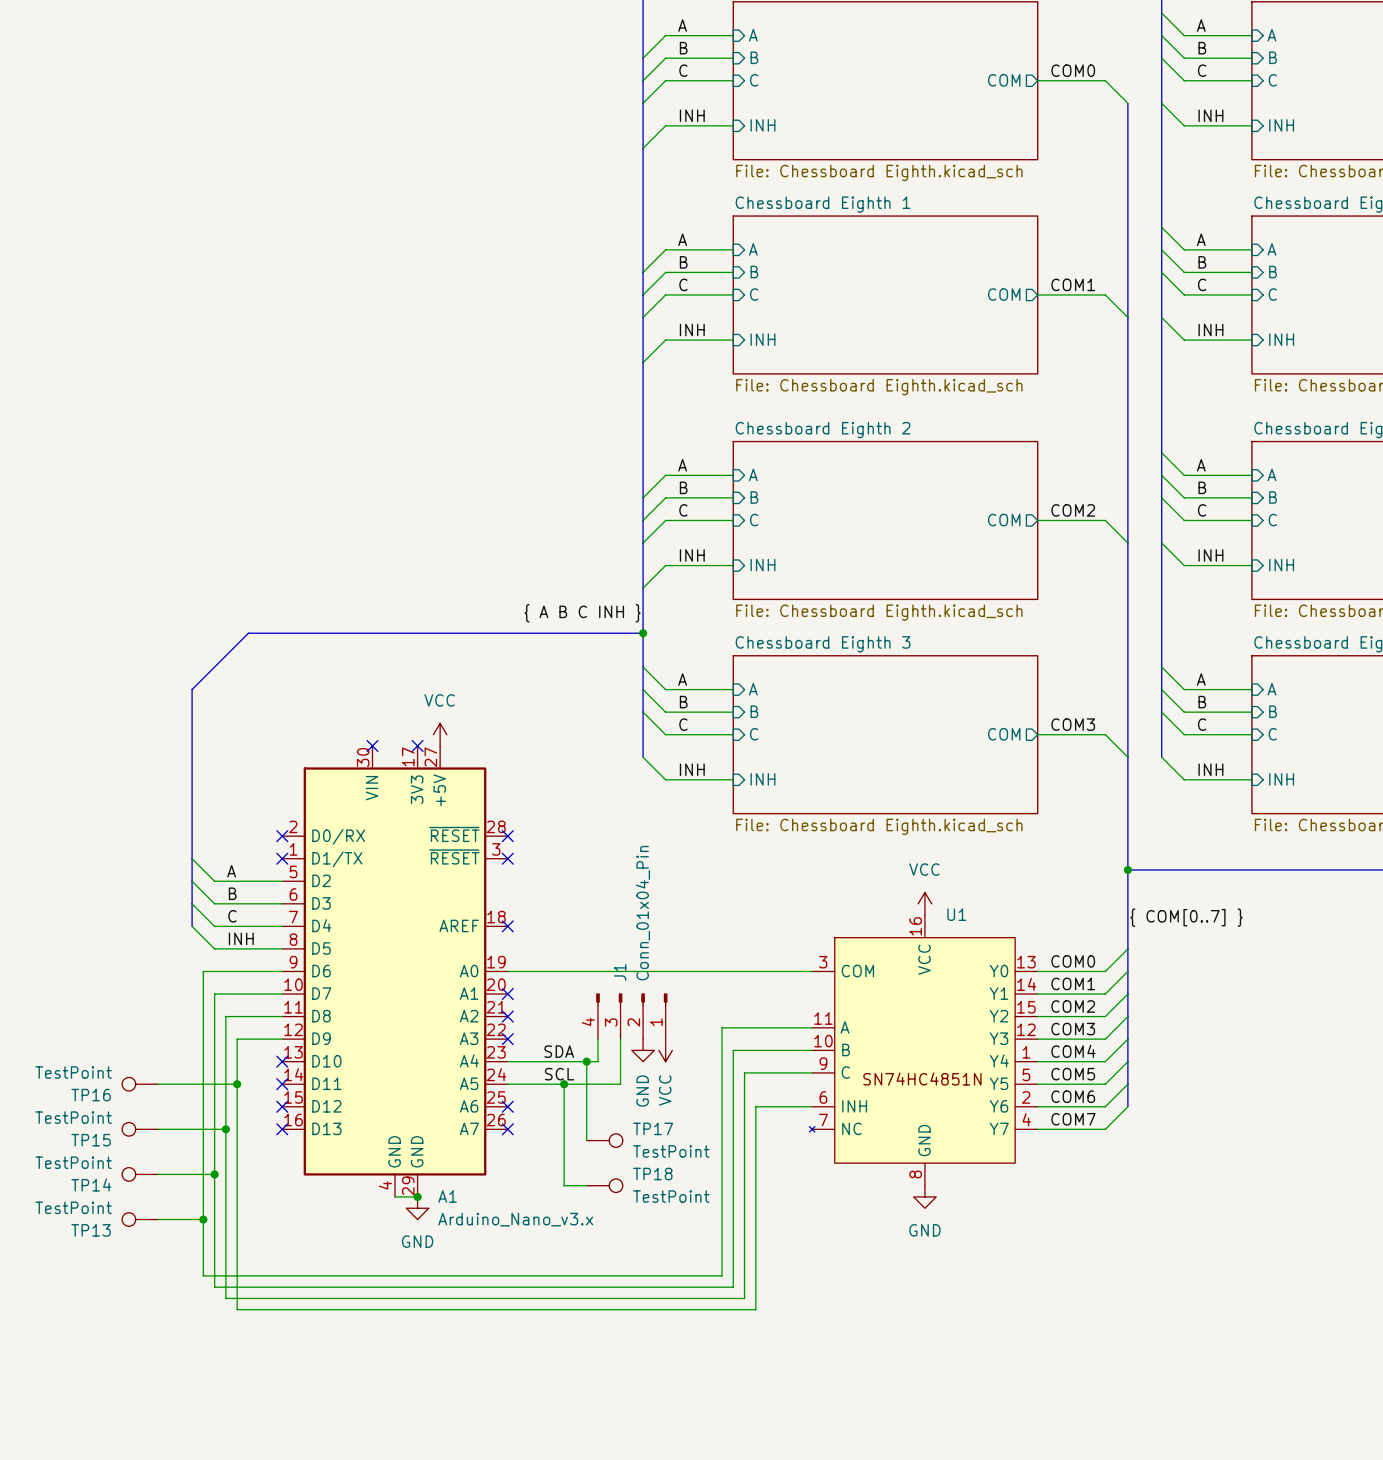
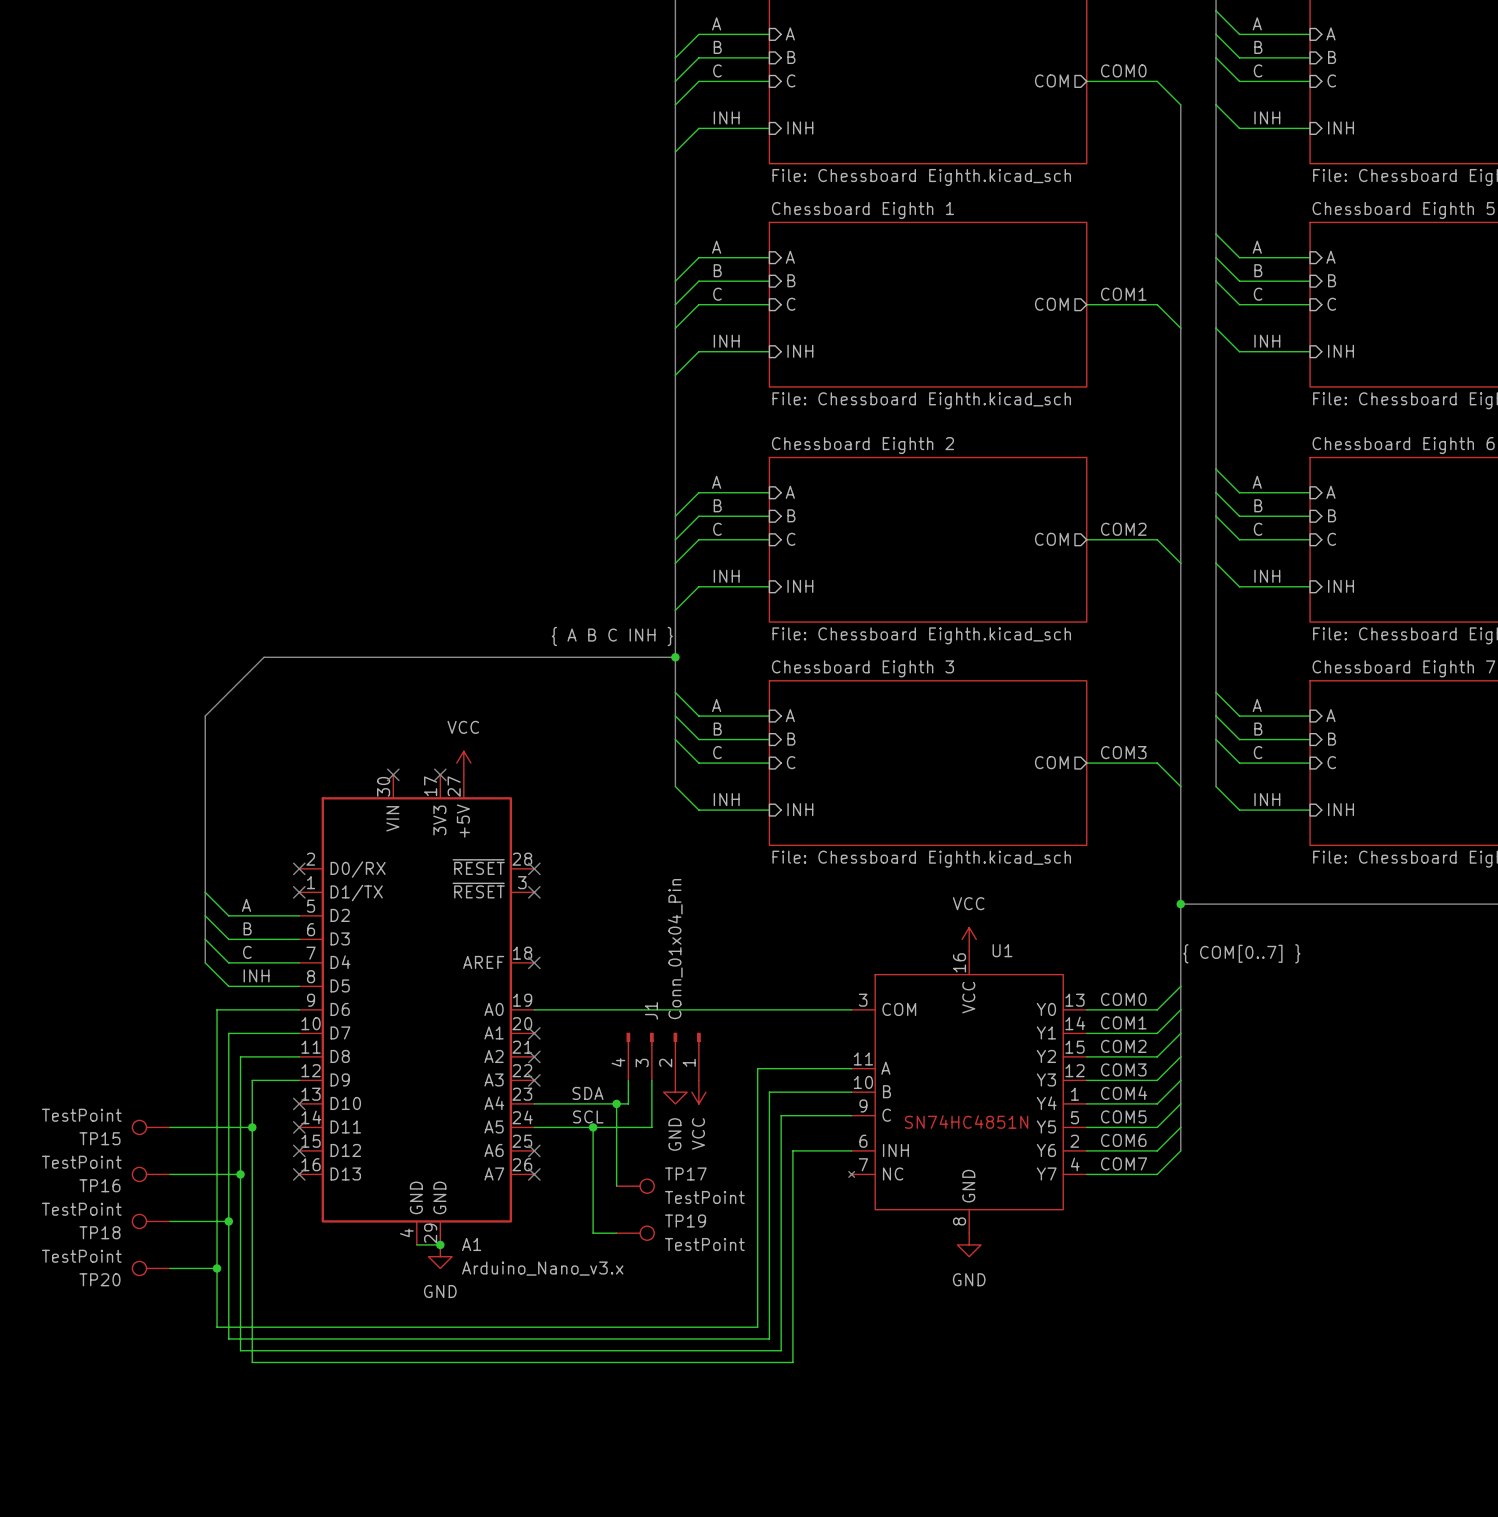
TP16 name: TP16 (91, 1095) -> TP15 (99, 1138)
TP15 name: TP15 (91, 1140) -> TP16 (99, 1185)
TP18 name: TP18 (652, 1174) -> TP19 (685, 1221)
TP14 name: TP14 (91, 1185) -> TP18 (99, 1232)
TP13 name: TP13 (91, 1230) -> TP20 (99, 1279)

